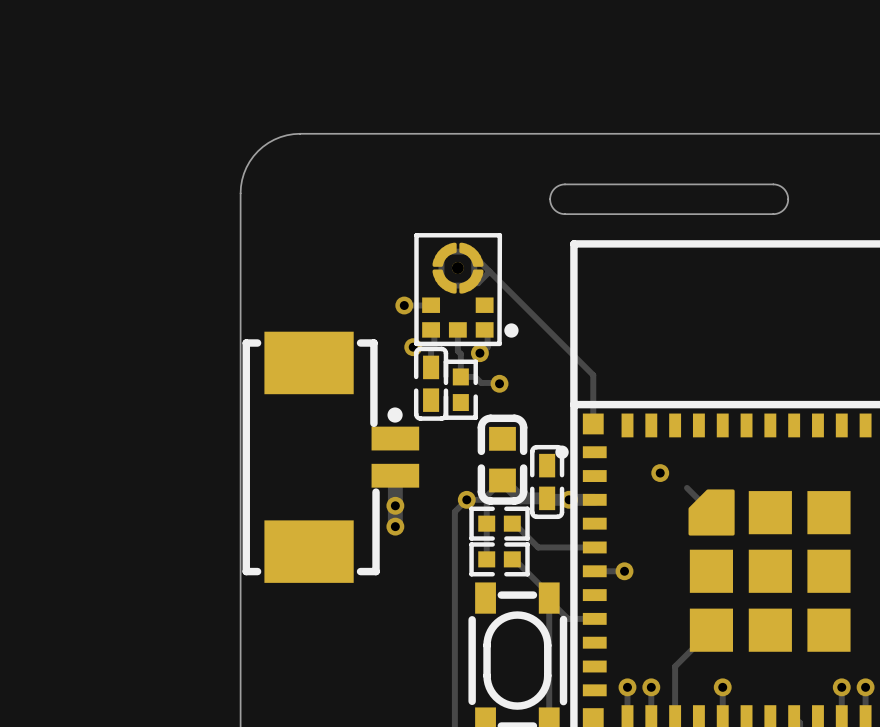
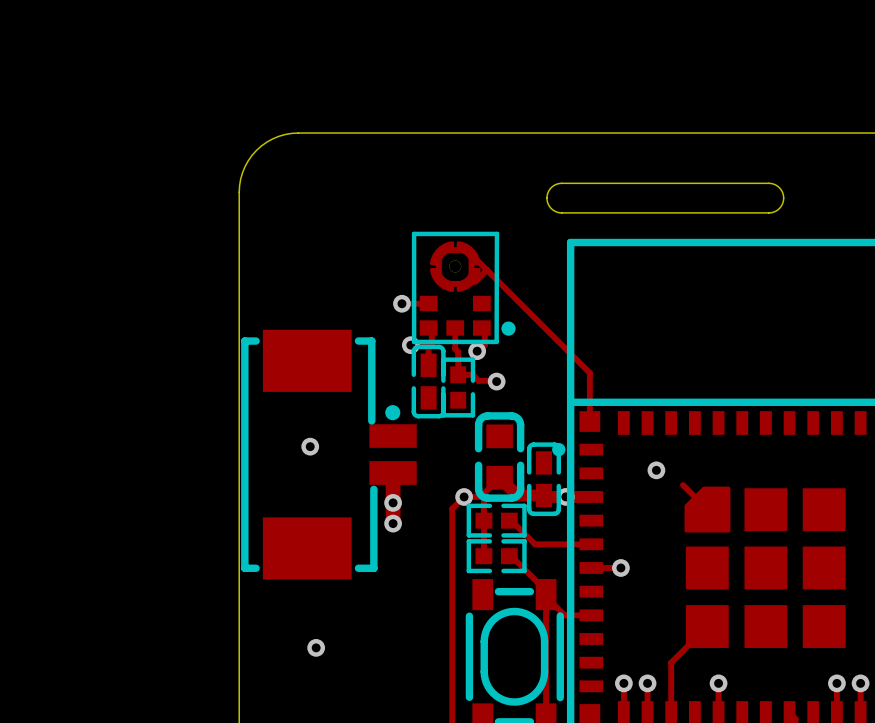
via: none -> (310, 446)
via: none -> (316, 647)

